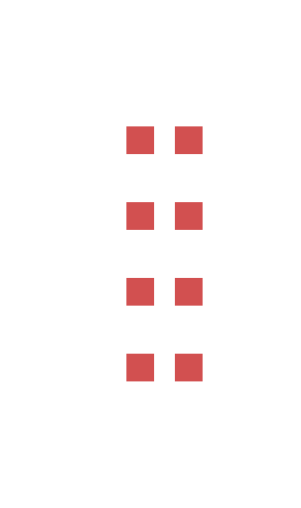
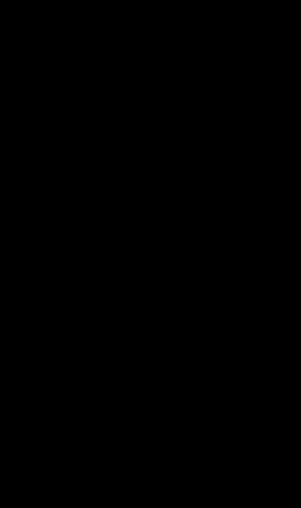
part: (164, 140) -> none
part: (164, 216) -> none
part: (164, 291) -> none
part: (164, 367) -> none

